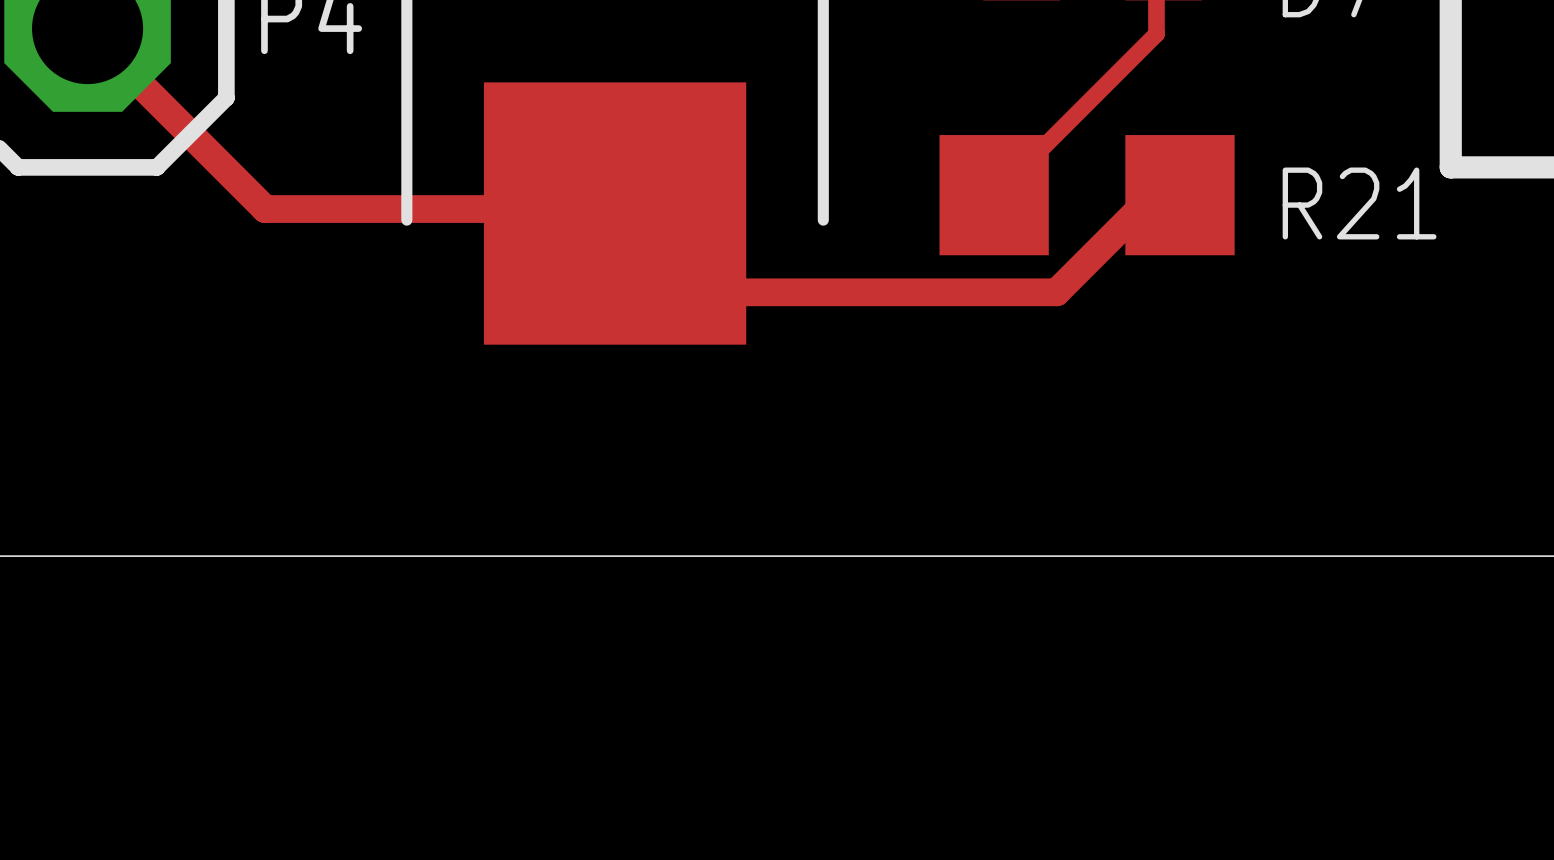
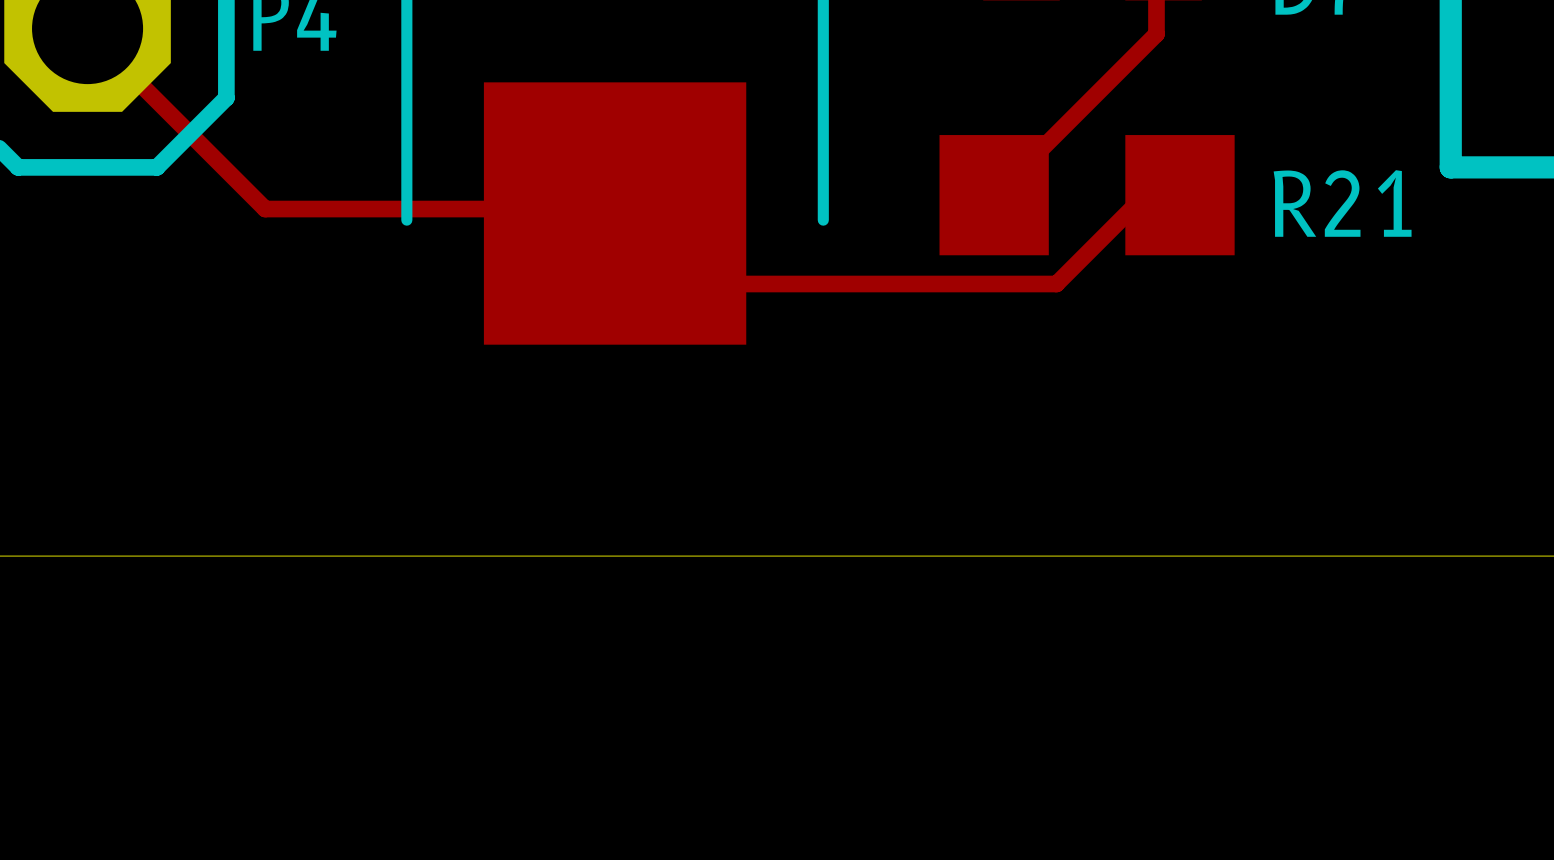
track width: thick (87, 28) (90, 34) (265, 209) (531, 209) -> thin (87, 28) (90, 34) (265, 209) (531, 209)
track: (1148, 200) (1056, 292) (690, 292) (615, 217) (615, 213) (606, 209) (531, 209) -> (1148, 200) (1139, 200) (1056, 284) (598, 284) (531, 217) (615, 213) (531, 209)

